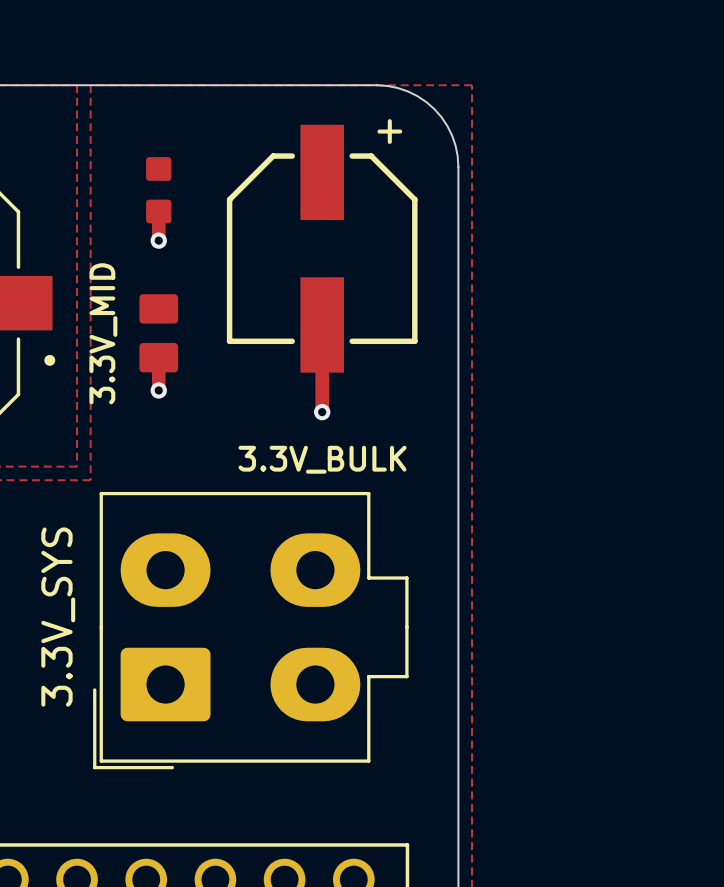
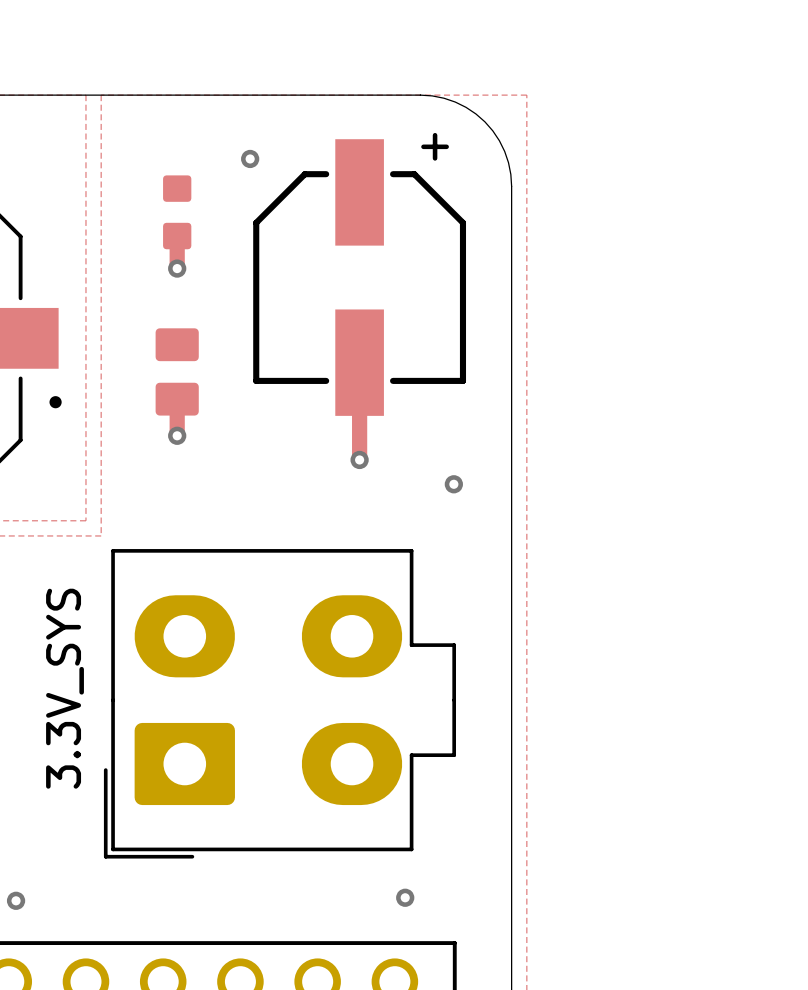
via: none -> (250, 158)
text: 3.3V_MID (103, 333) -> none
via: none -> (453, 484)
text: 3.3V_BULK (322, 459) -> none
via: none -> (405, 897)
via: none -> (16, 900)

